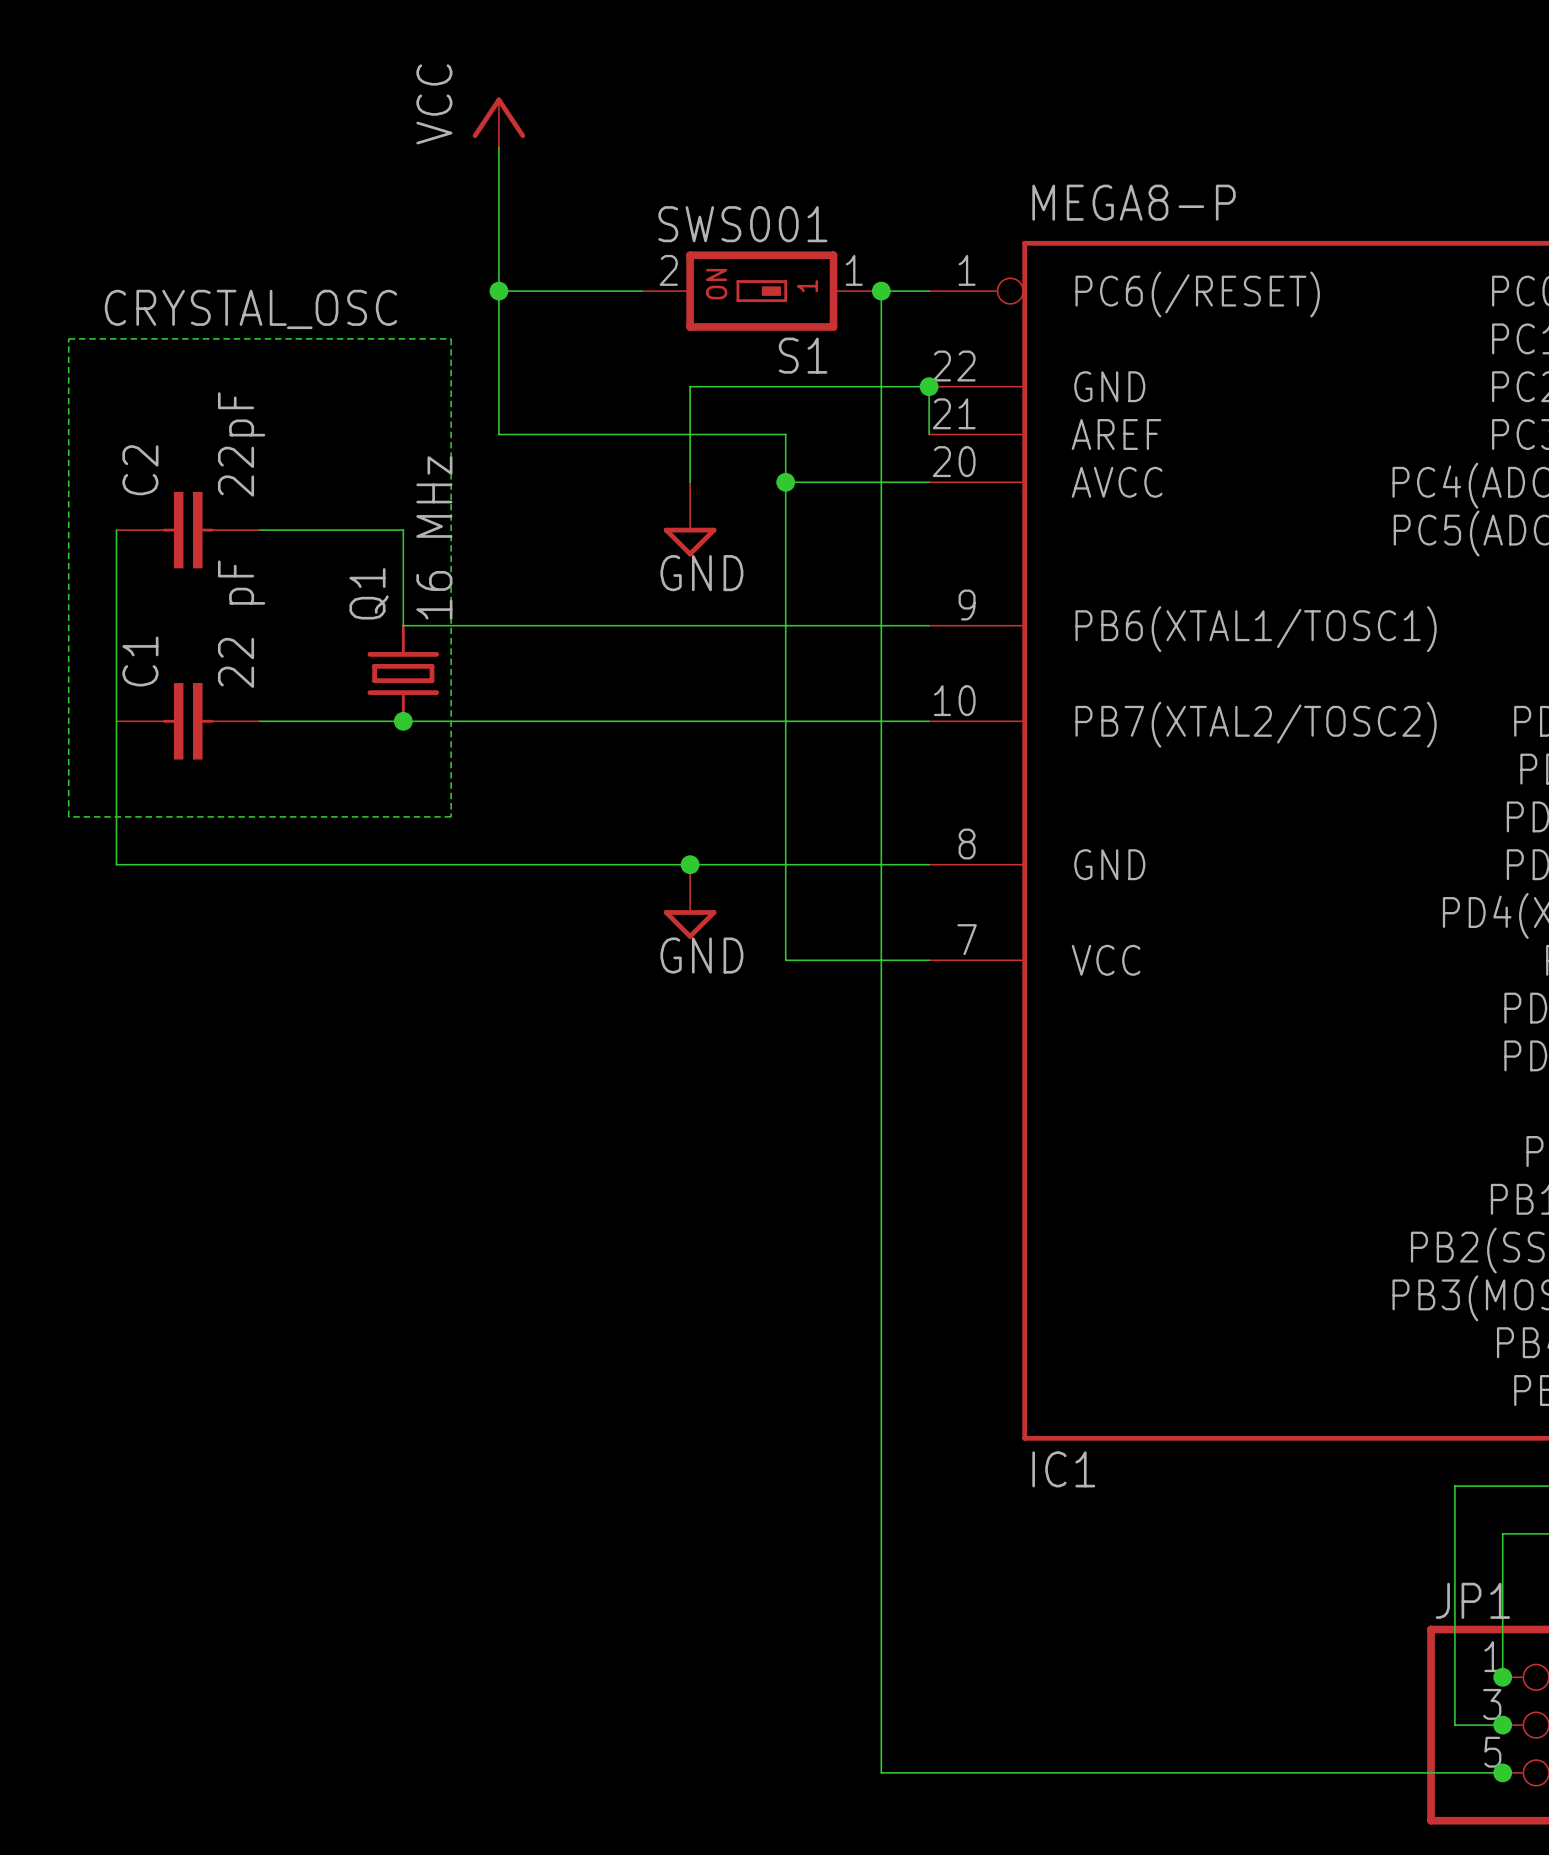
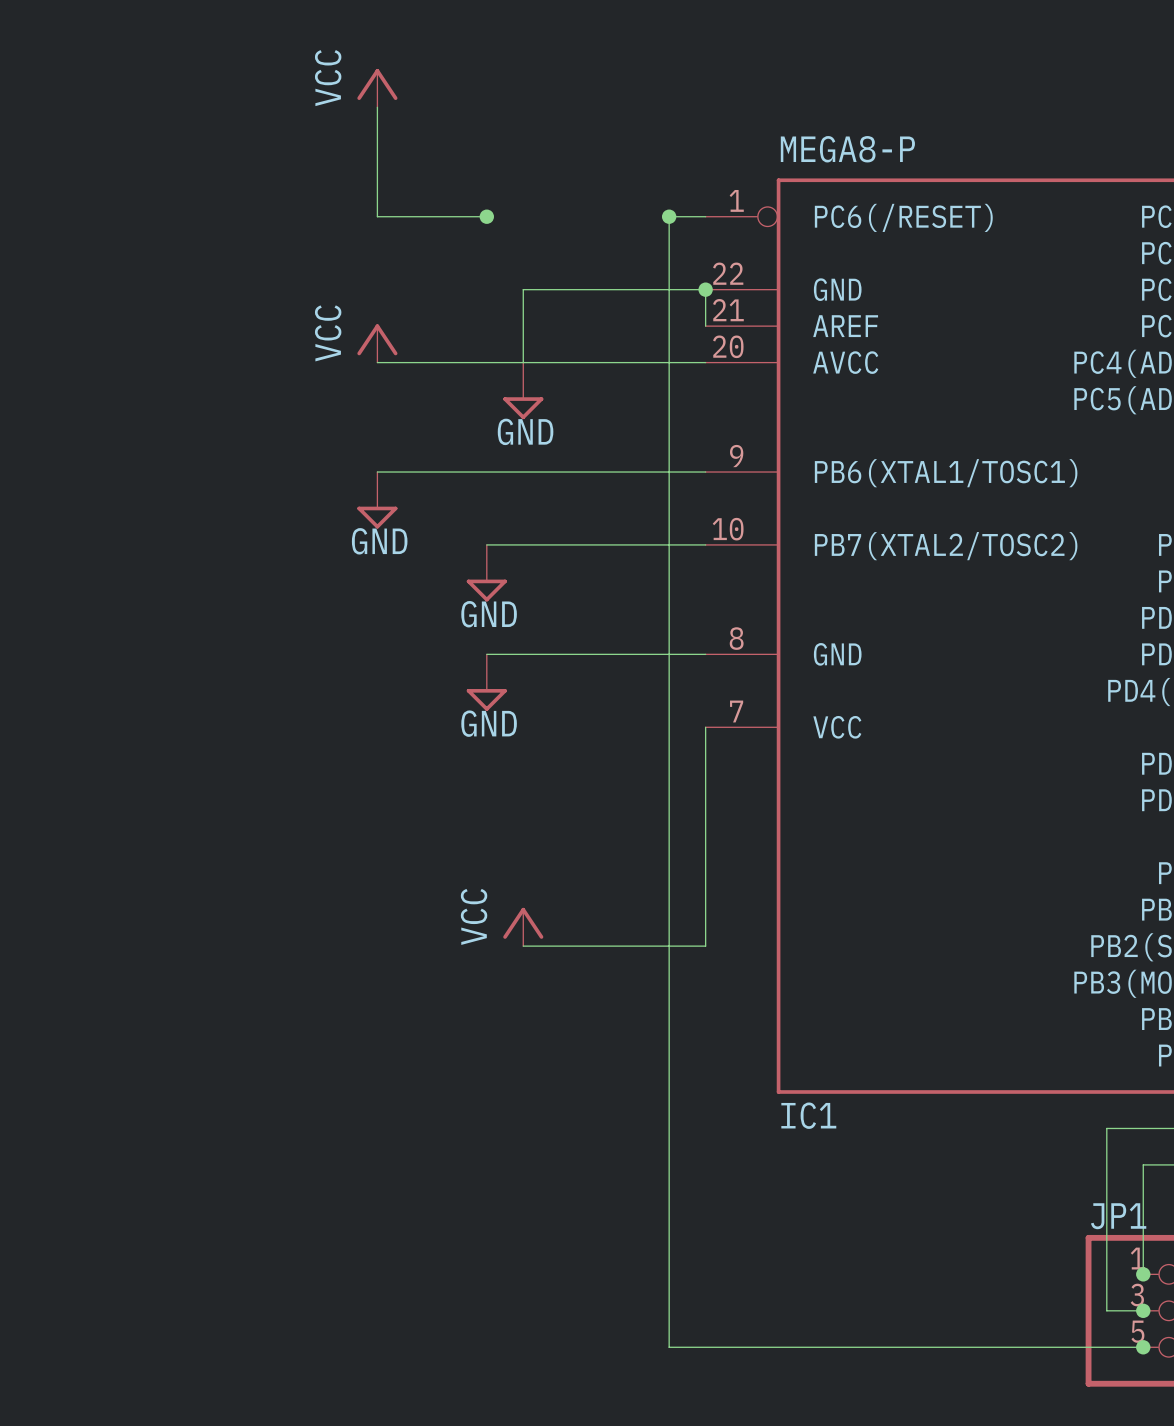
wire: (498, 291) (498, 434) (785, 434) (785, 960) (929, 960) -> (523, 946) (705, 946) (705, 727)
junction: (498, 291) -> none
junction: none -> (486, 216)
S1: SWS001 (761, 291) -> none
label: CRYSTAL_OSC (250, 309) -> none
wire: (68, 338) (451, 338) (451, 816) (68, 816) (68, 338) -> none
power symbol: none -> VCC (377, 343)
wire: none -> (377, 362) (596, 362)
junction: (785, 482) -> none
wire: (116, 530) (116, 864) (642, 864) -> none
C2: 22pF (188, 530) -> none
wire: (259, 530) (403, 530) (403, 625) (498, 625) -> none
power symbol: none -> GND (377, 500)
Q1: 16 MHz (403, 673) -> none
C1: 22 pF (188, 721) -> none
wire: (259, 721) (642, 721) -> none
junction: (403, 721) -> none
power symbol: none -> GND (486, 573)
junction: (690, 864) -> none
power symbol position: GND (690, 901) -> GND (486, 682)
power symbol: none -> VCC (523, 926)

